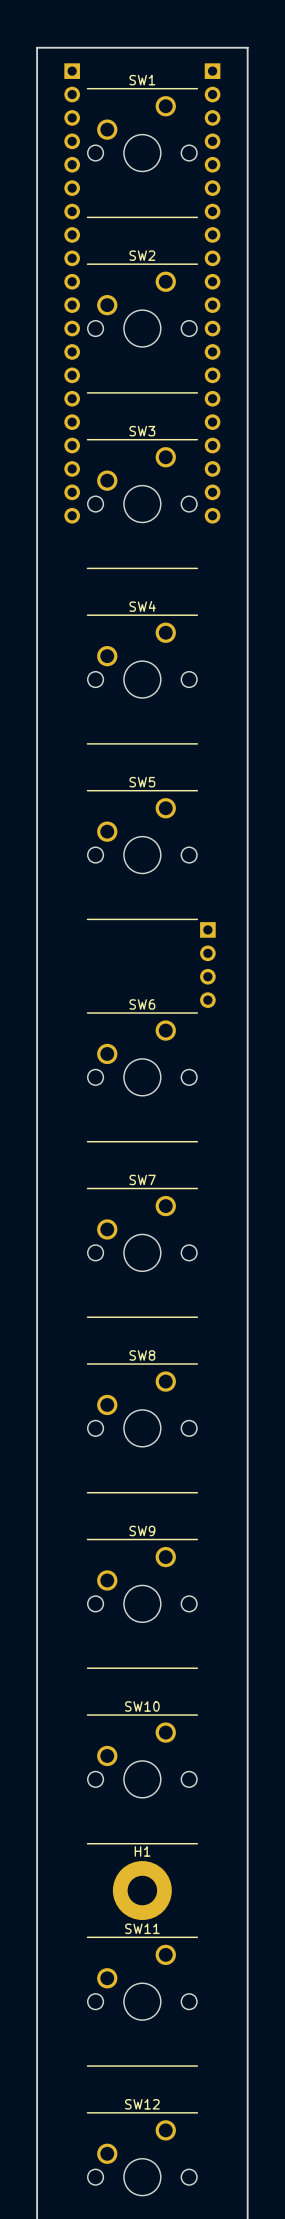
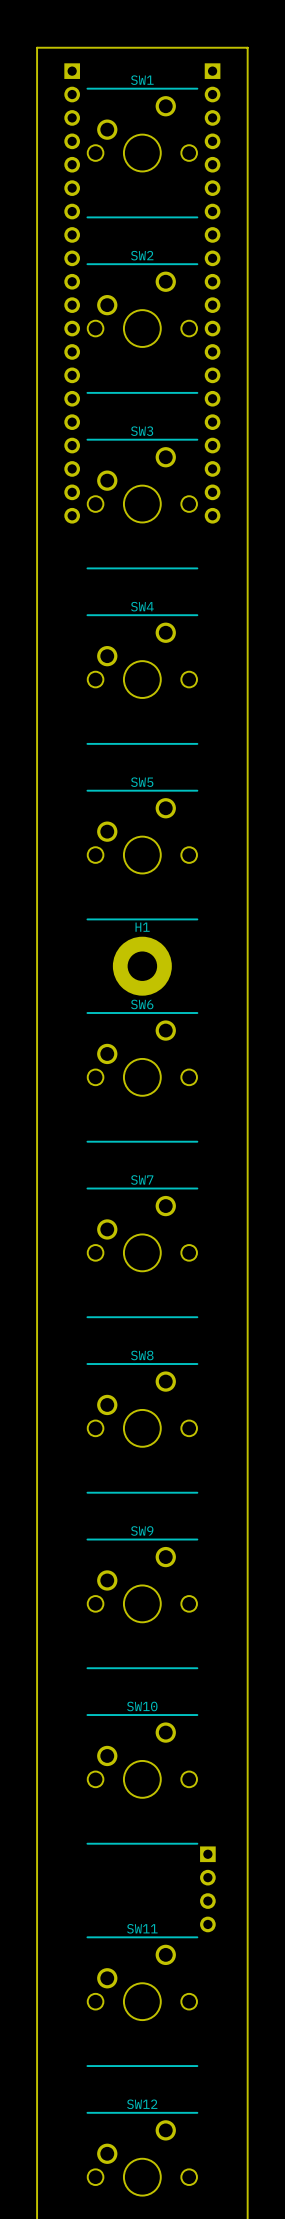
part: (207, 965) -> none
part: none -> (207, 1889)
H1 position: (142, 1890) -> (142, 966)

